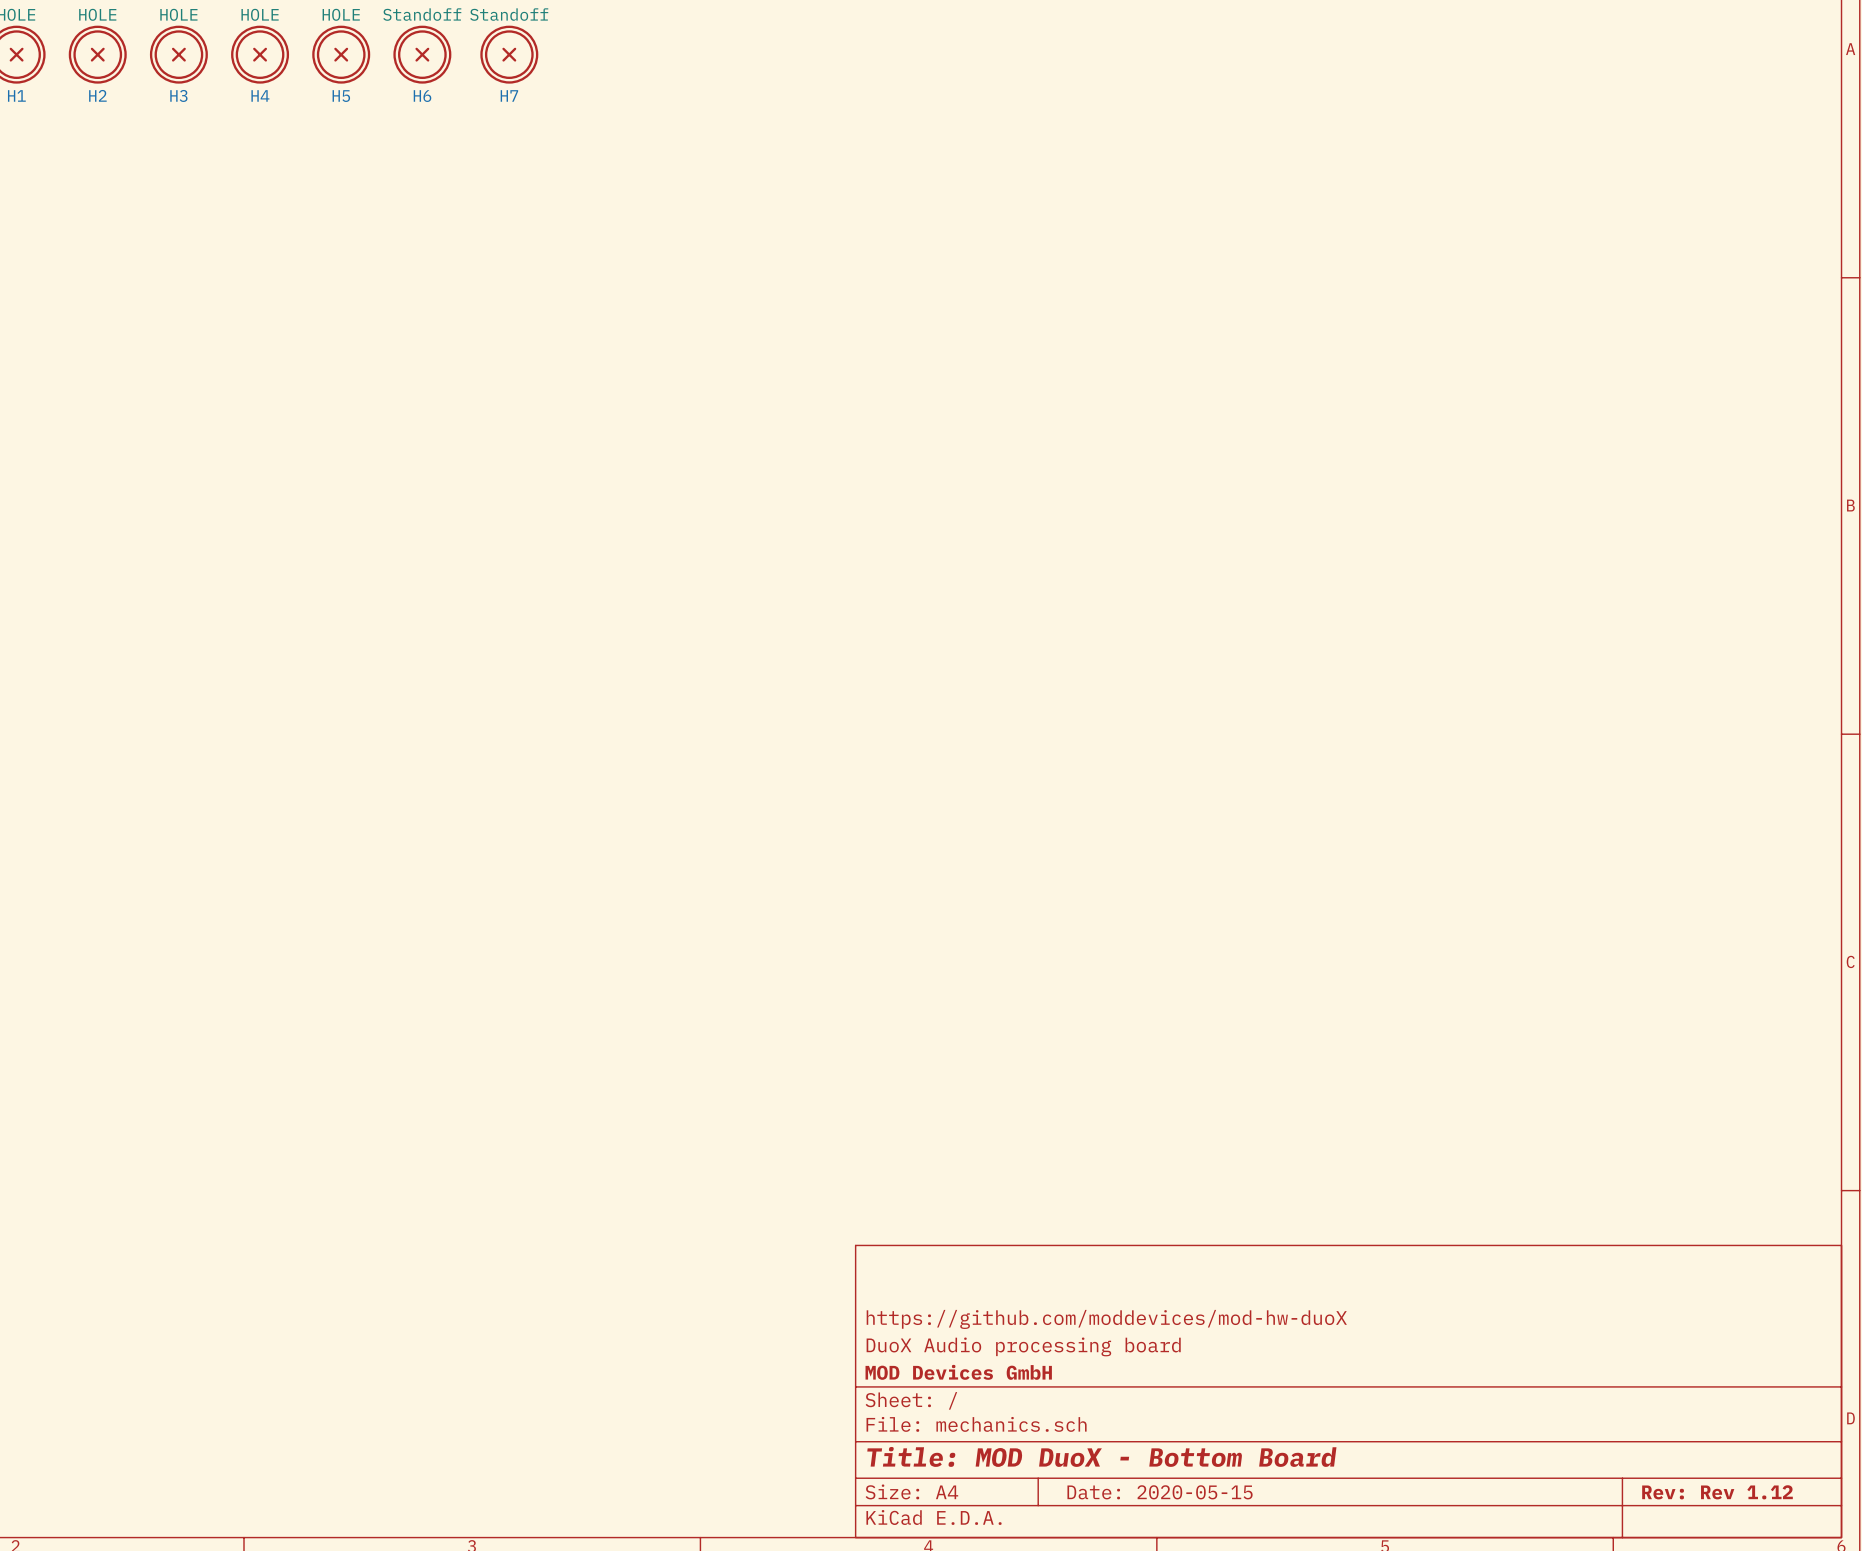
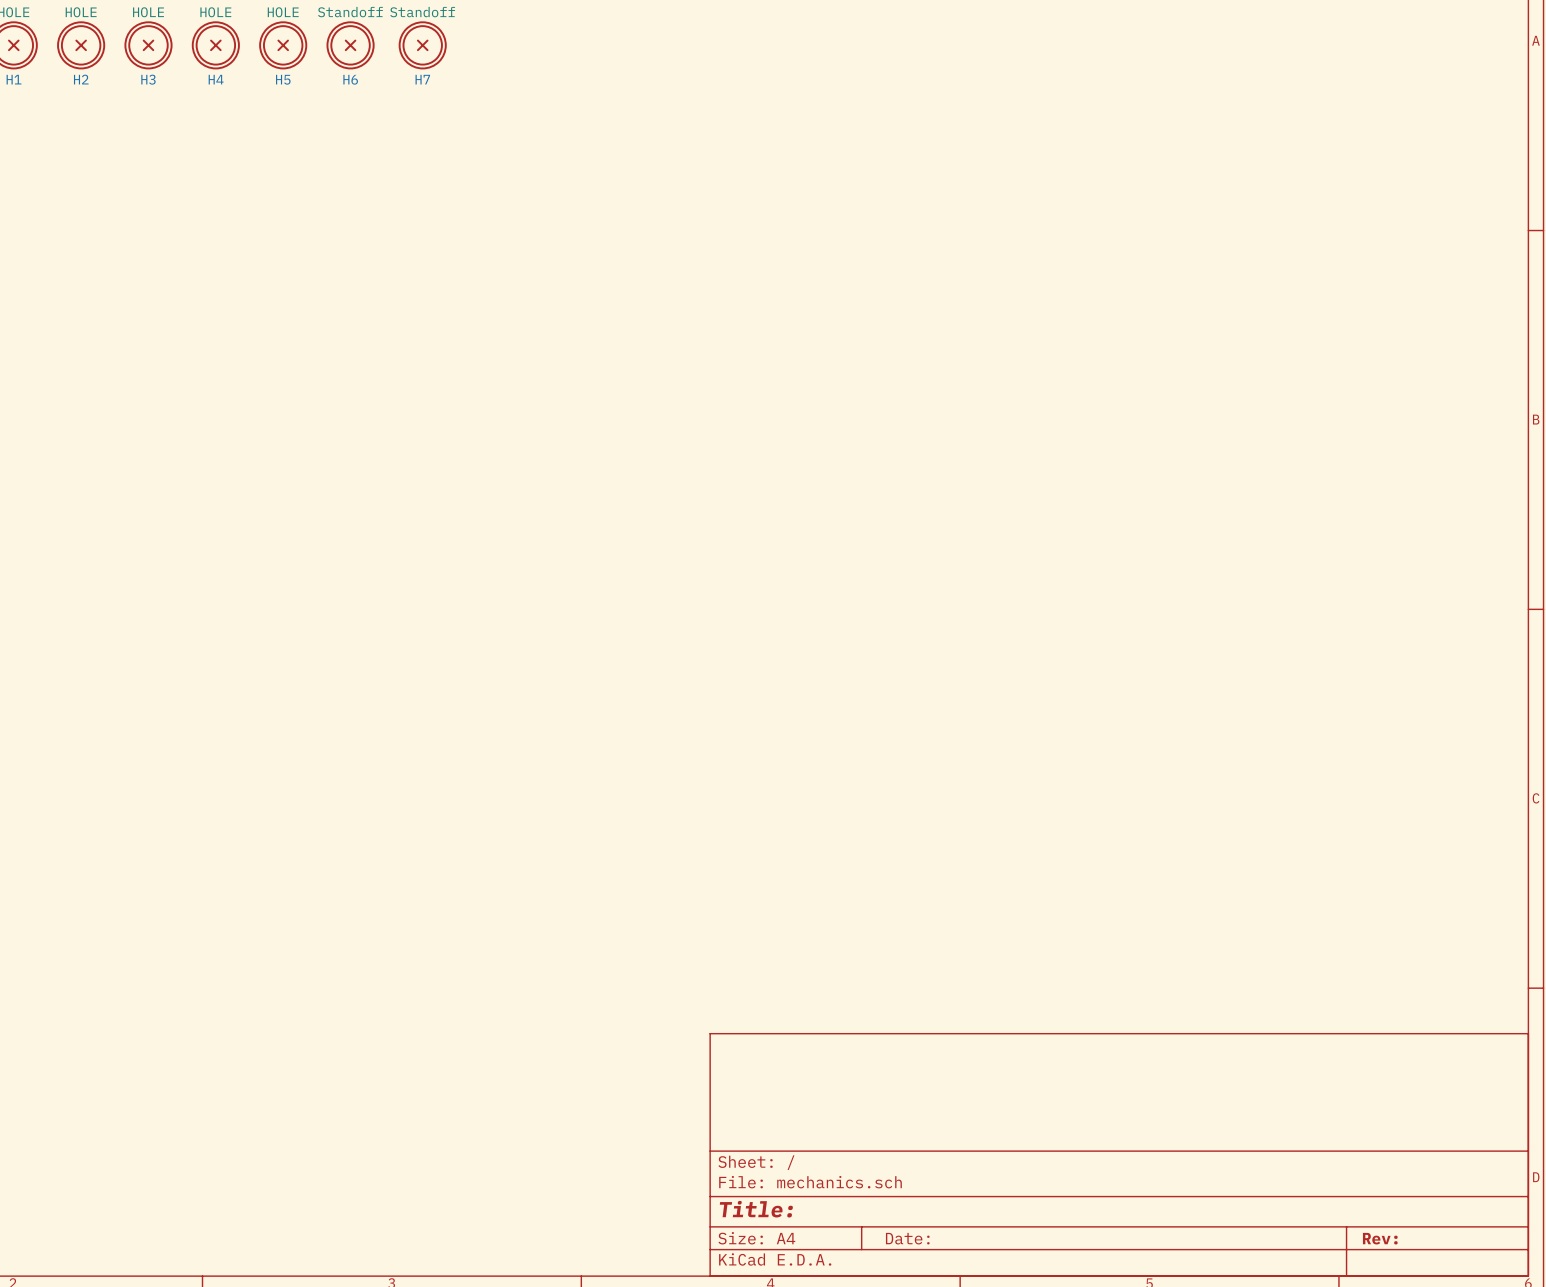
title block: https://github.com/moddevices/mod-hw-duoX (1106, 1319) -> none
title block: DuoX Audio processing board (1023, 1346) -> none
title block: MOD Devices GmbH (958, 1372) -> none
title block: Title: MOD DuoX - Bottom Board (1101, 1456) -> Title: (756, 1209)
title block: Date: 2020-05-15 (1160, 1492) -> Date: (907, 1238)
title block: Rev: Rev 1.12 (1717, 1492) -> Rev: (1380, 1238)

